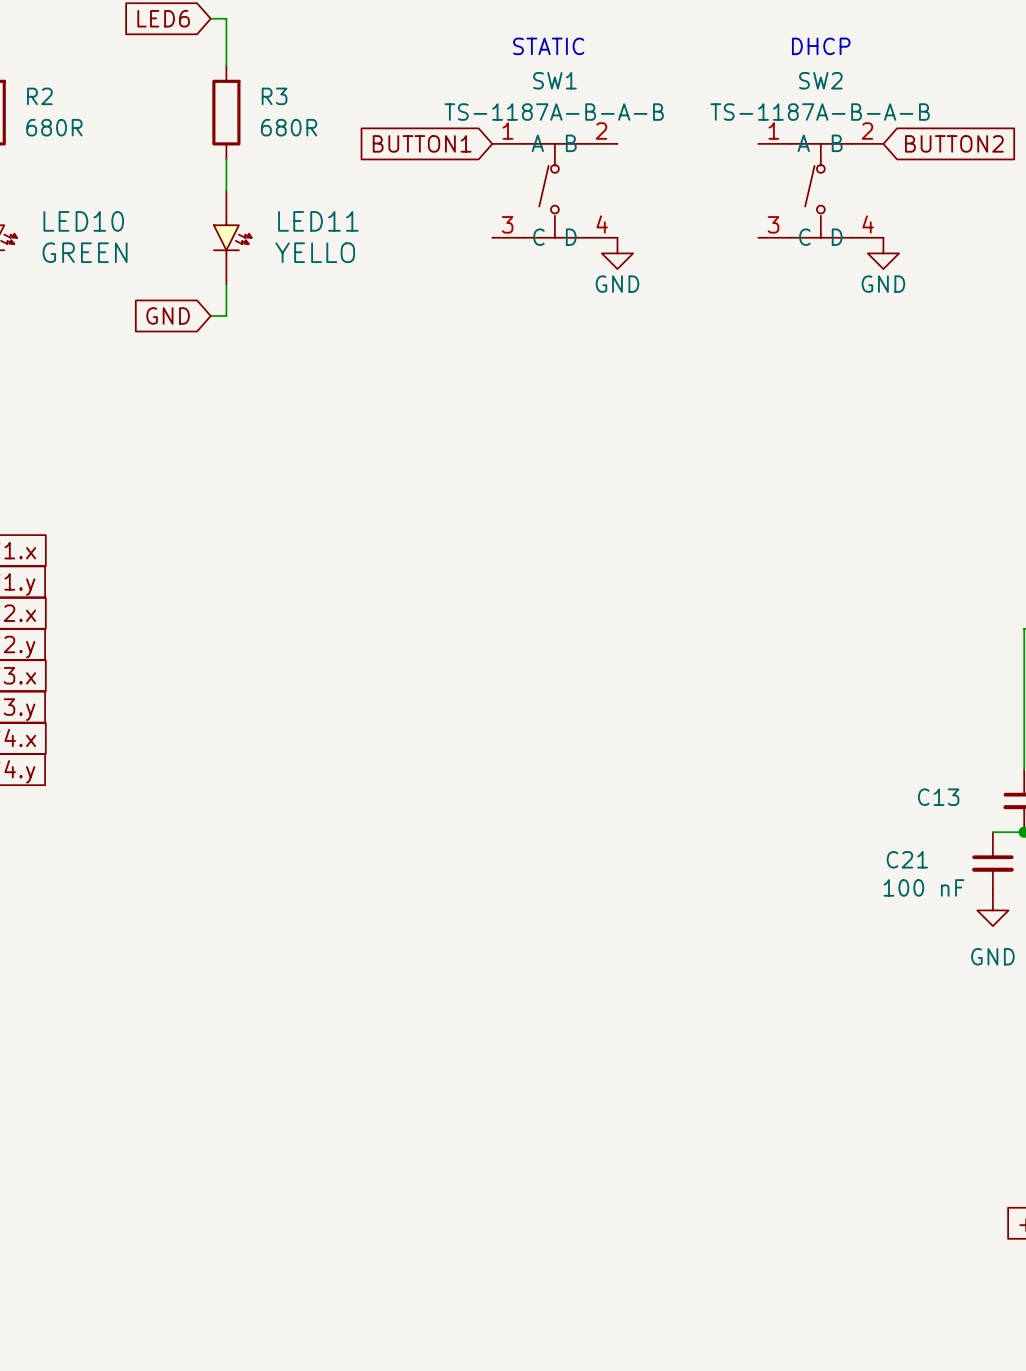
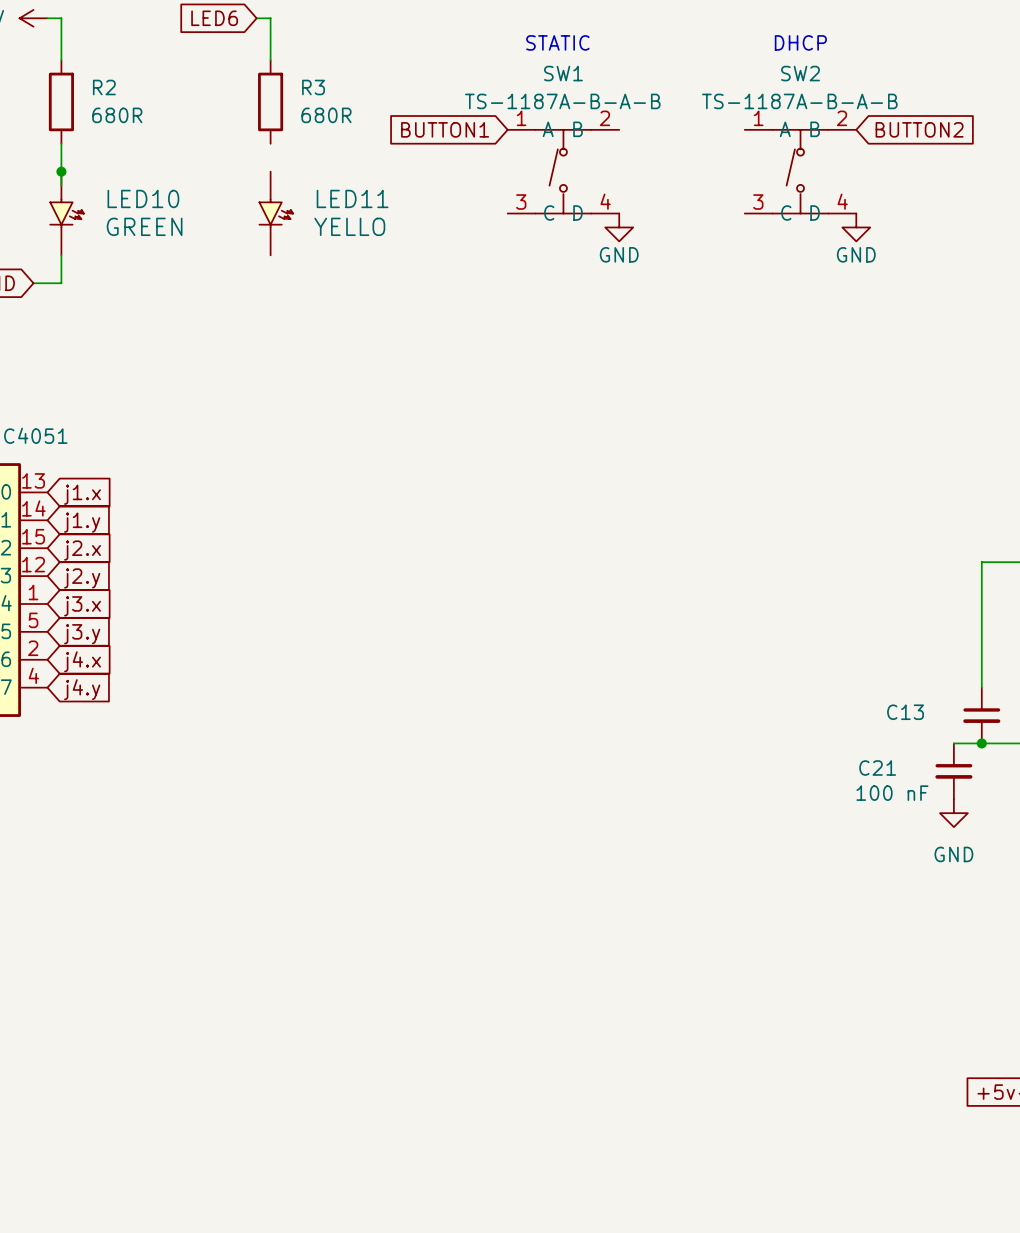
wire: (226, 159) (226, 190) -> none
wire: (226, 284) (226, 315) (210, 315) -> none
global label: GND (168, 315) -> none

